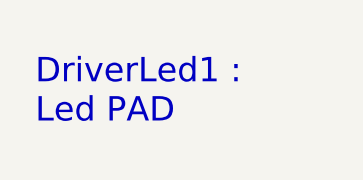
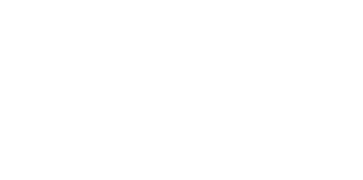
text: DriverLed1 : (138, 68) -> none
text: Led PAD (105, 108) -> none

